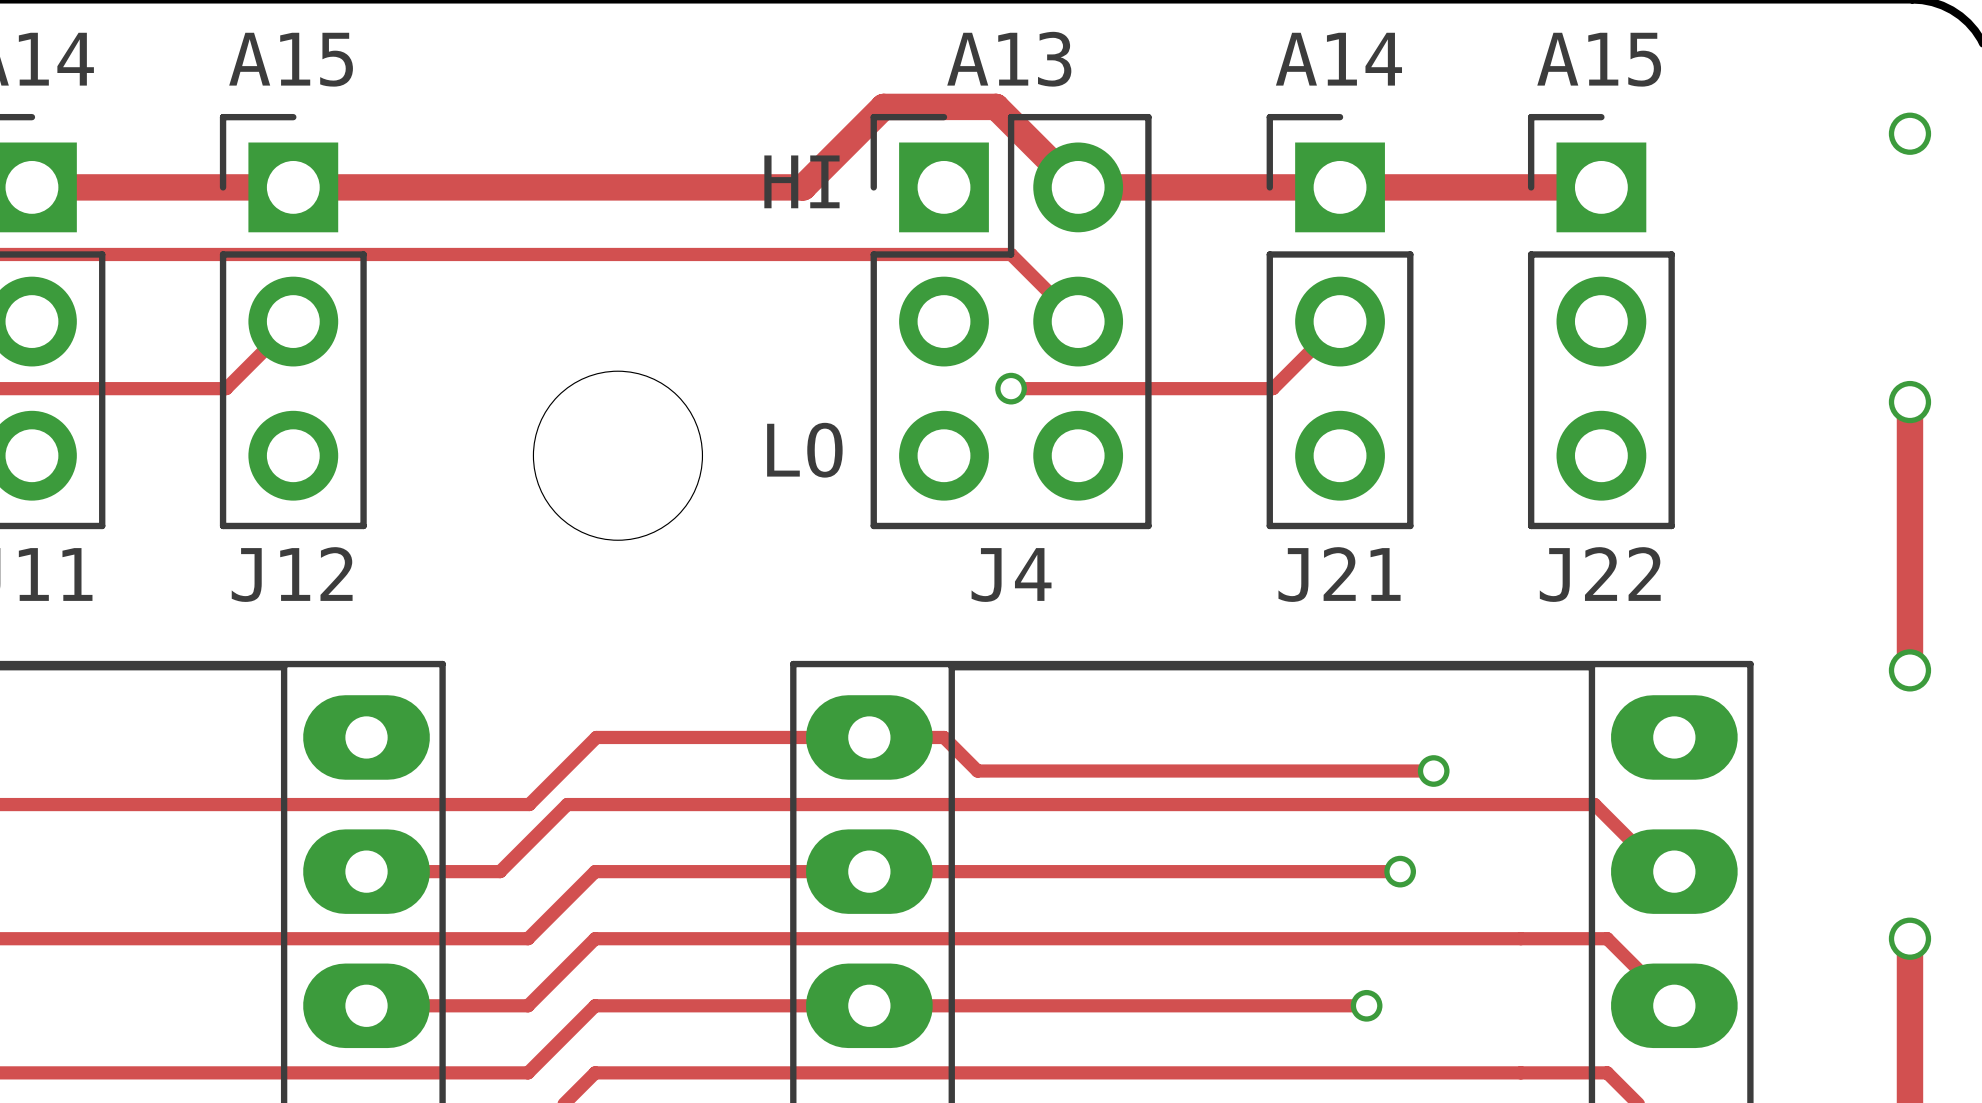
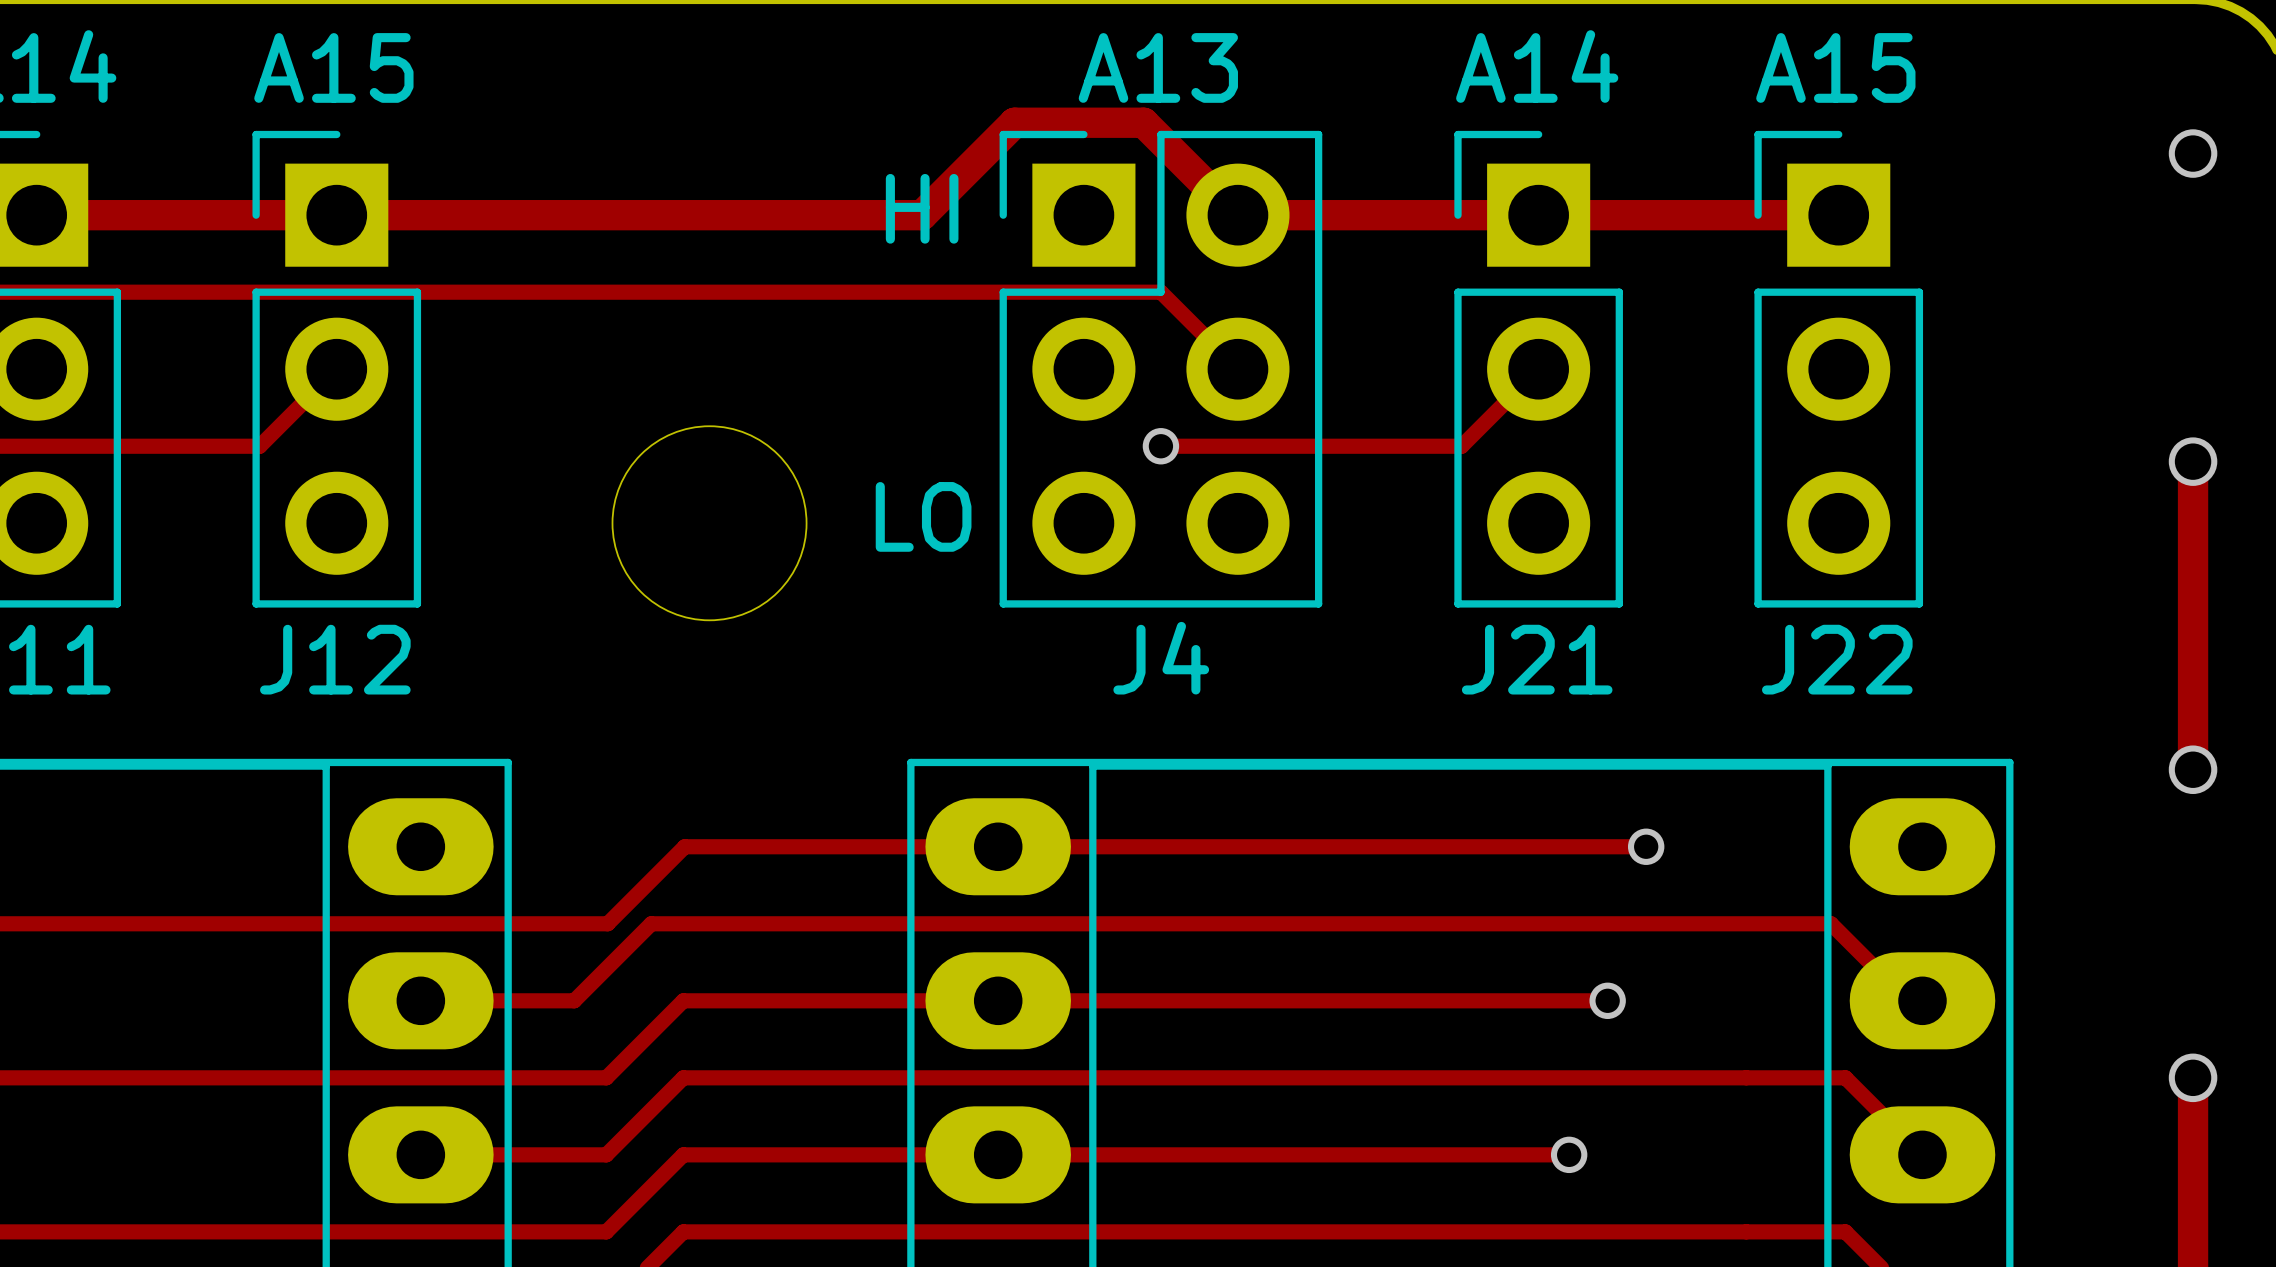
track: (944, 737) (977, 771) (1433, 771) -> (1083, 846) (1646, 846)
via position: (1433, 771) -> (1646, 846)

